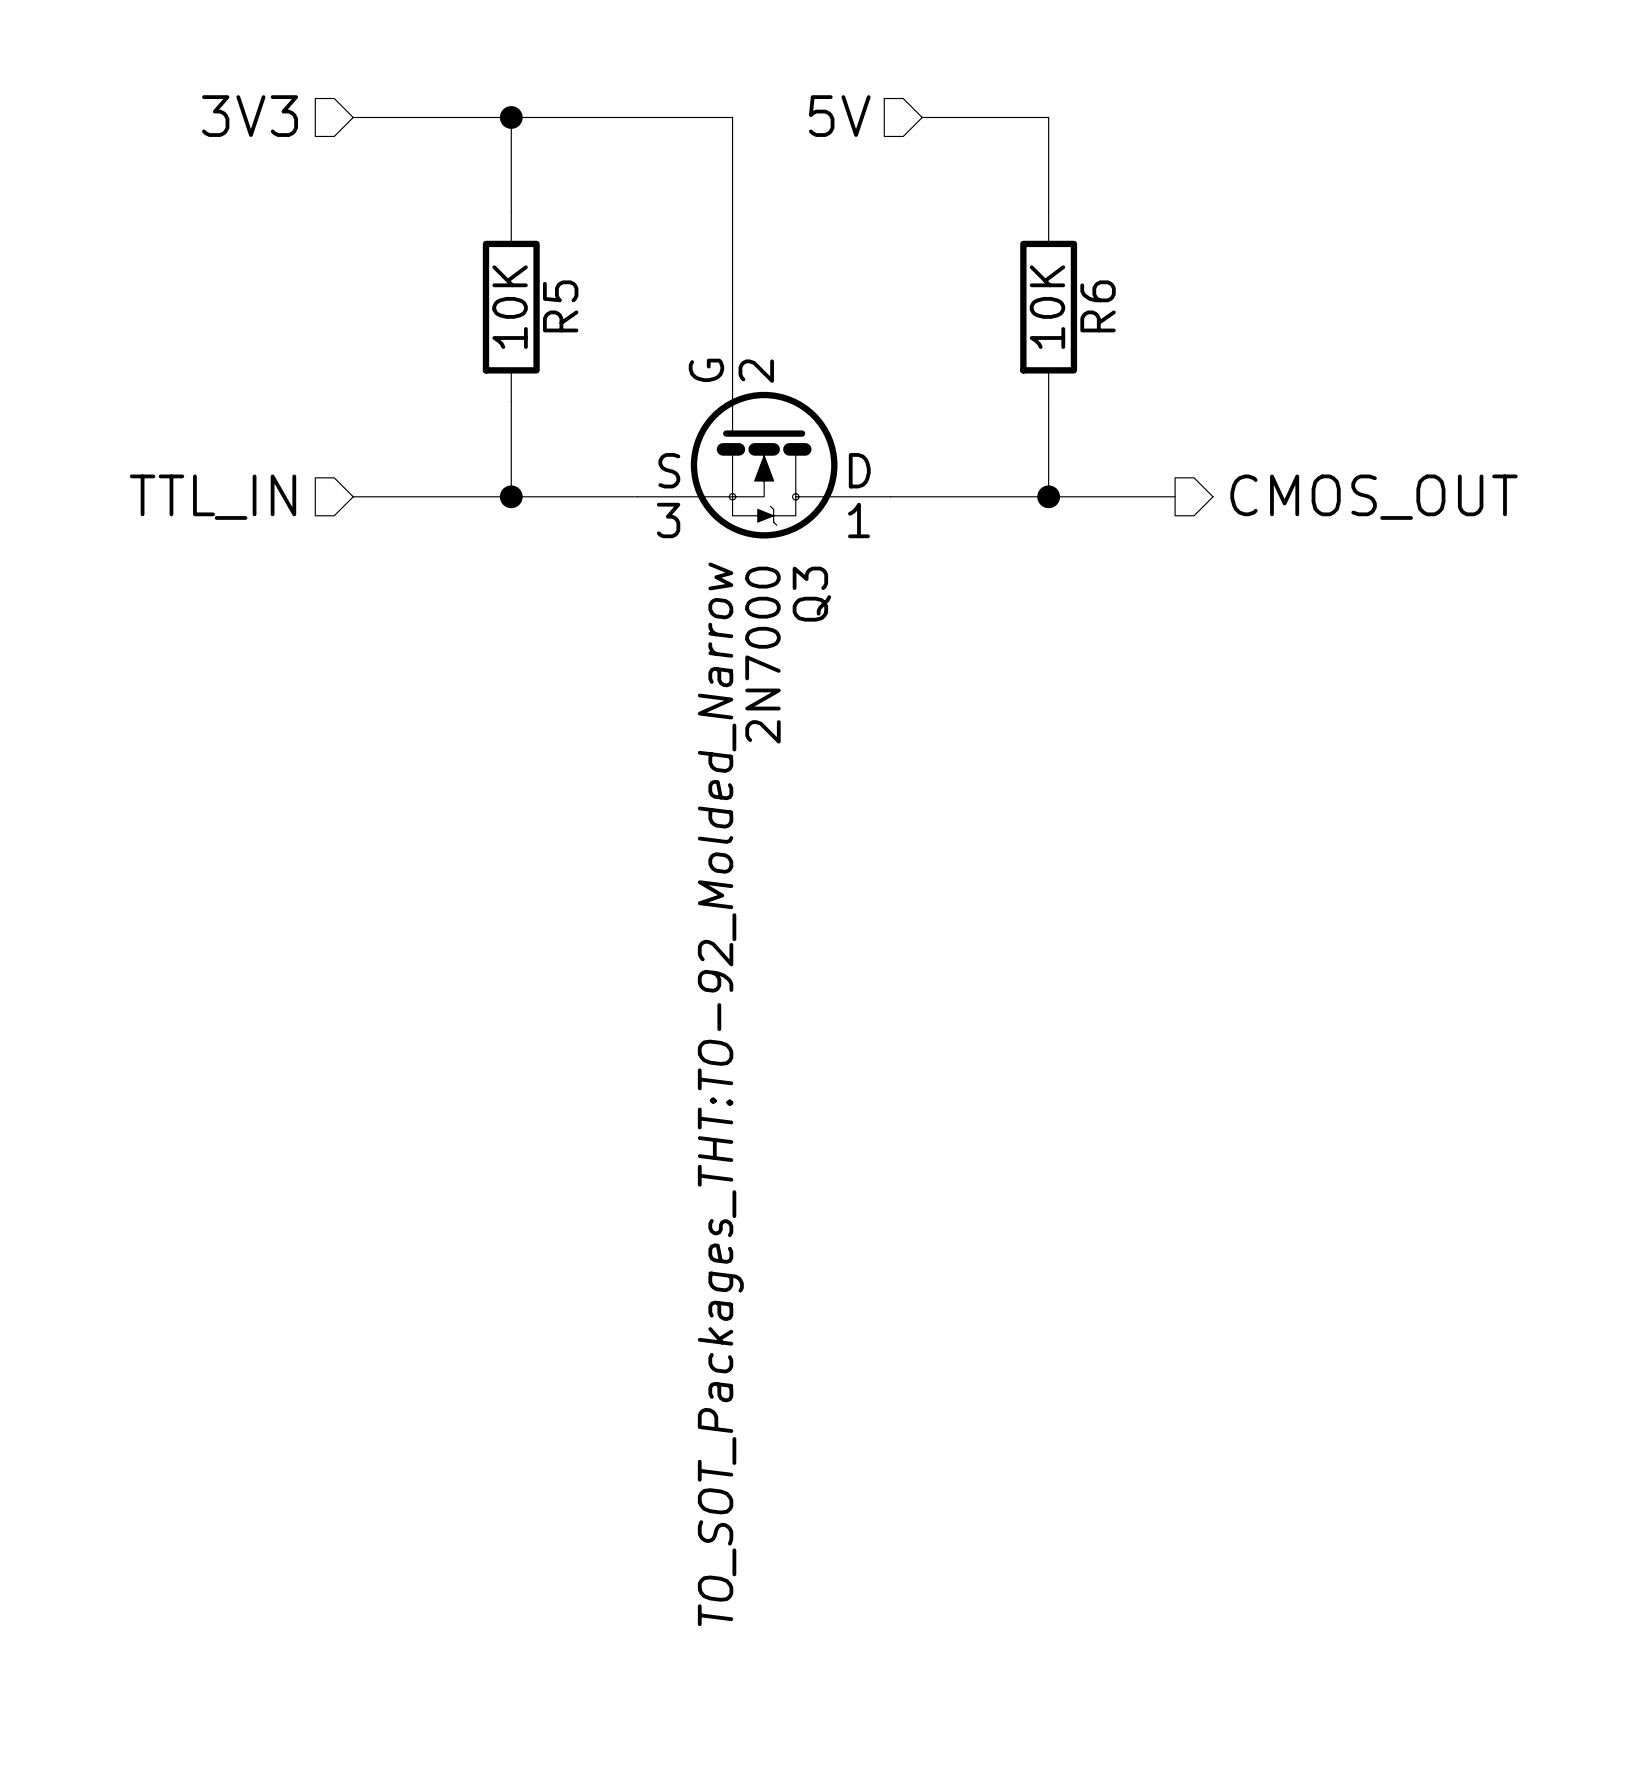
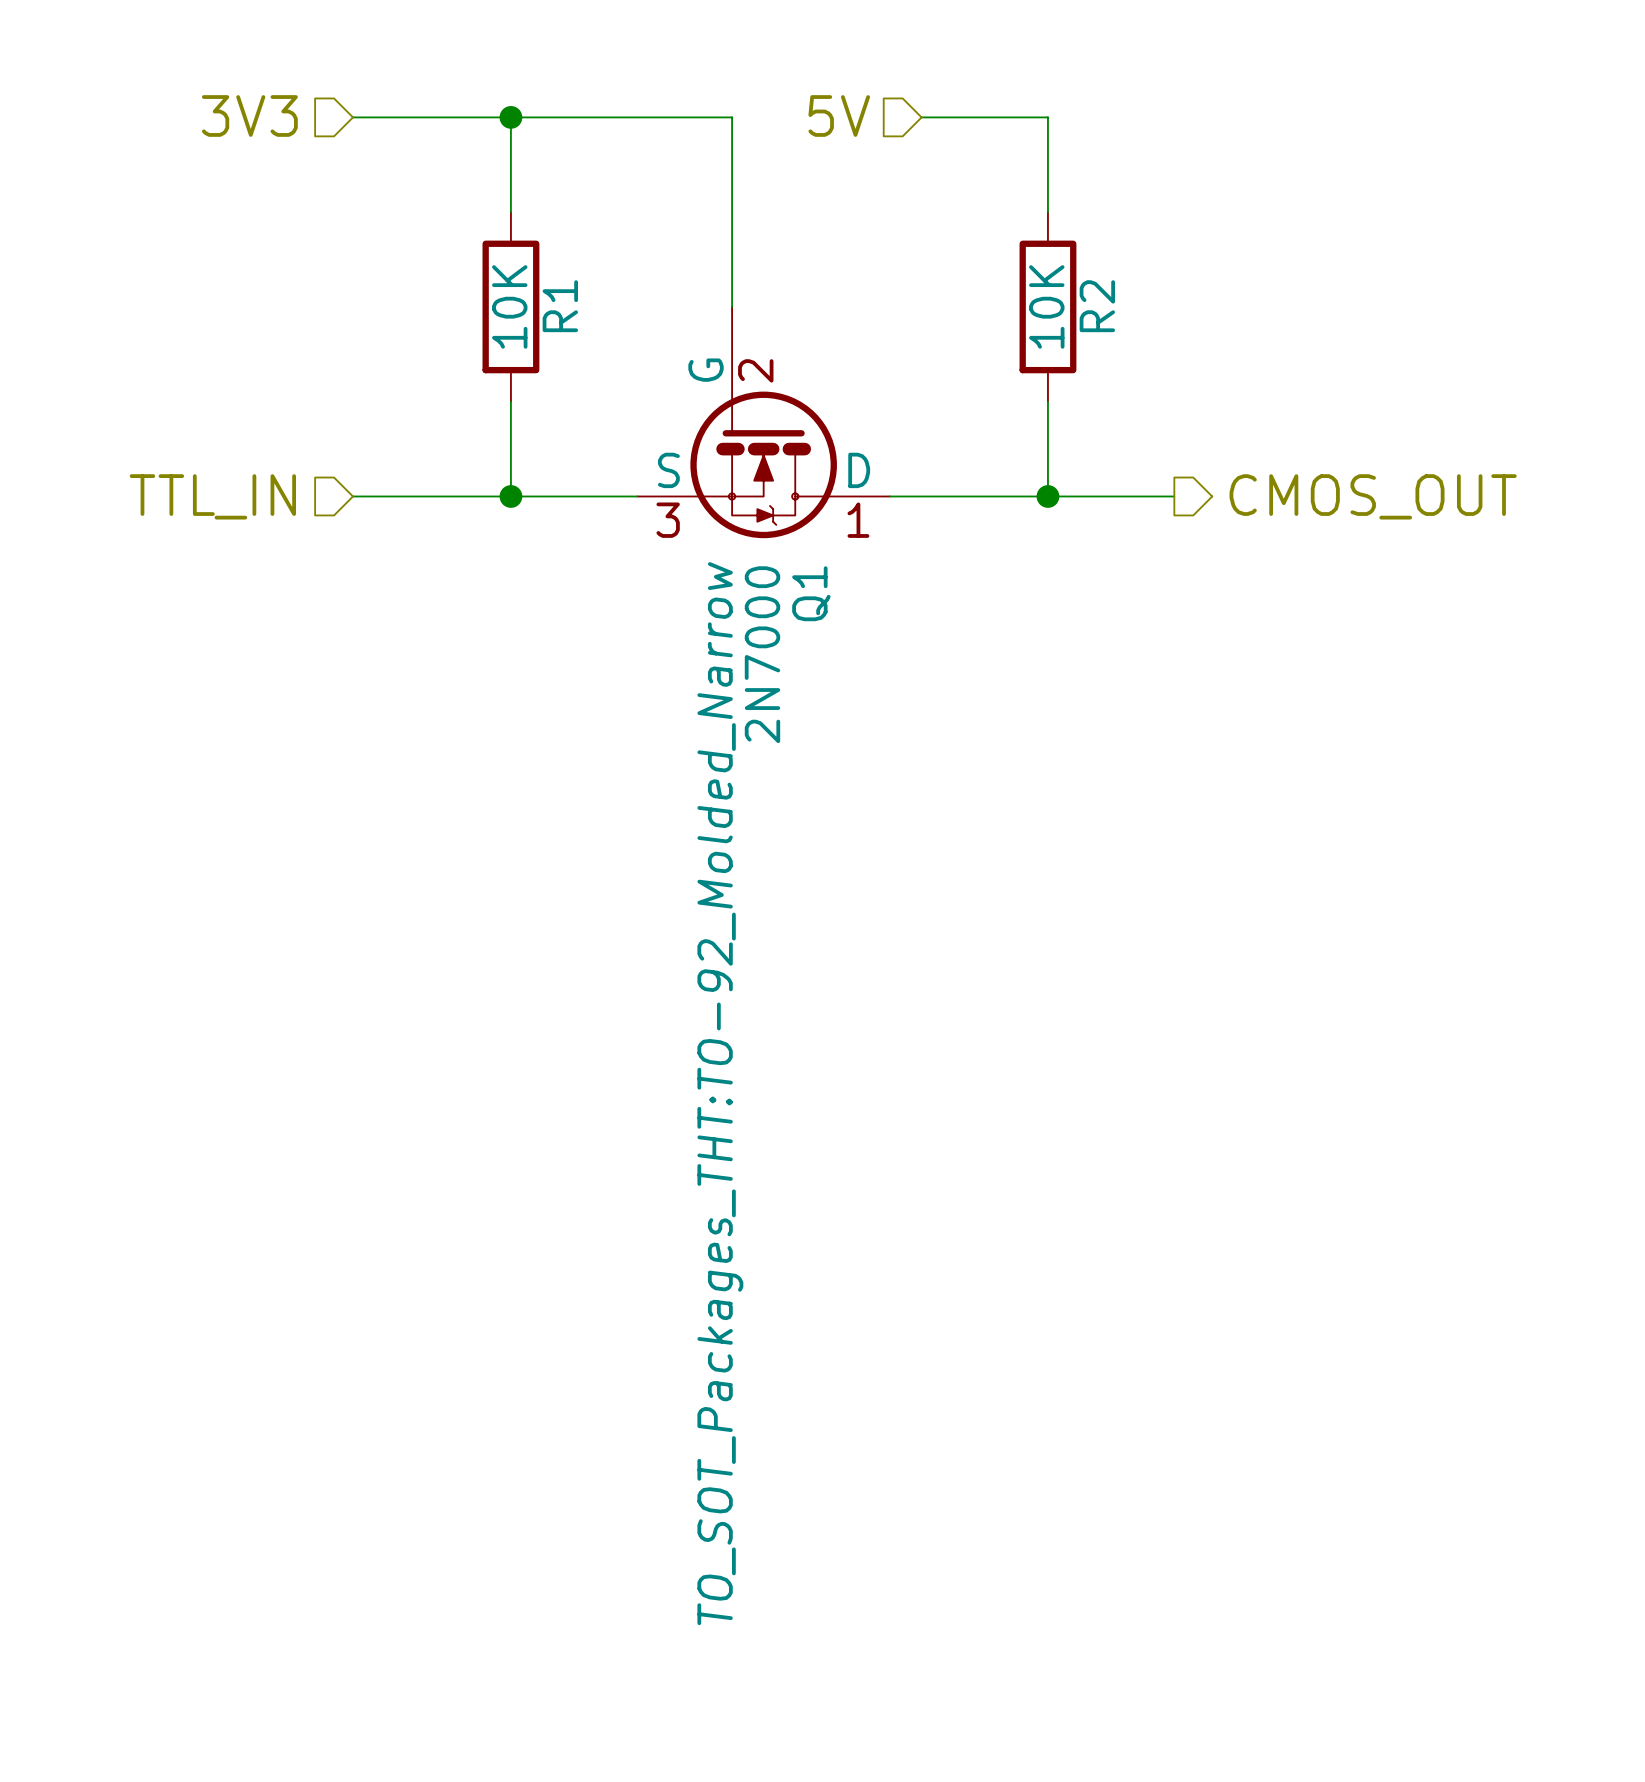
R5 name: R5 (560, 306) -> R1 (560, 306)
R6 name: R6 (1098, 306) -> R2 (1097, 306)
Q3 name: Q3 (811, 594) -> Q1 (811, 593)

